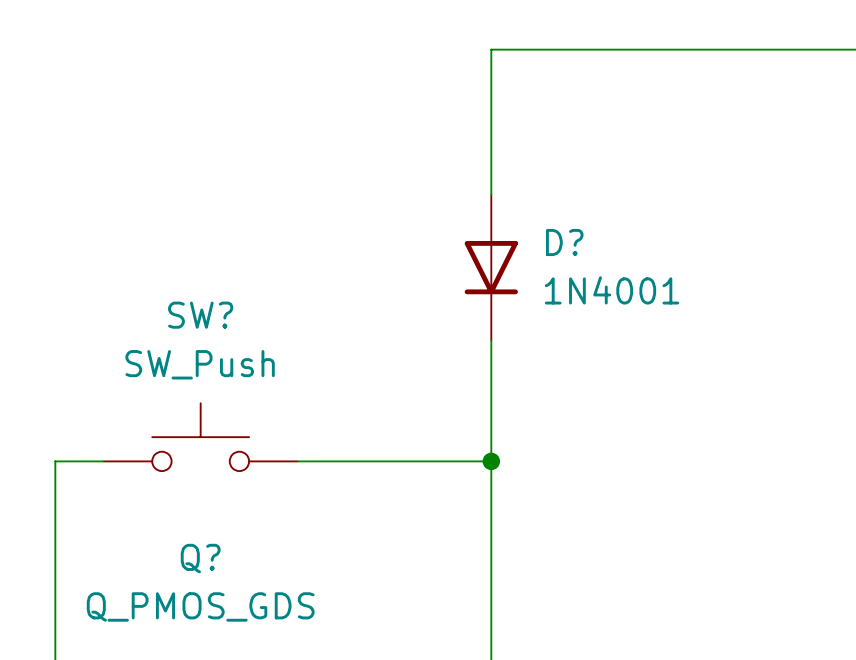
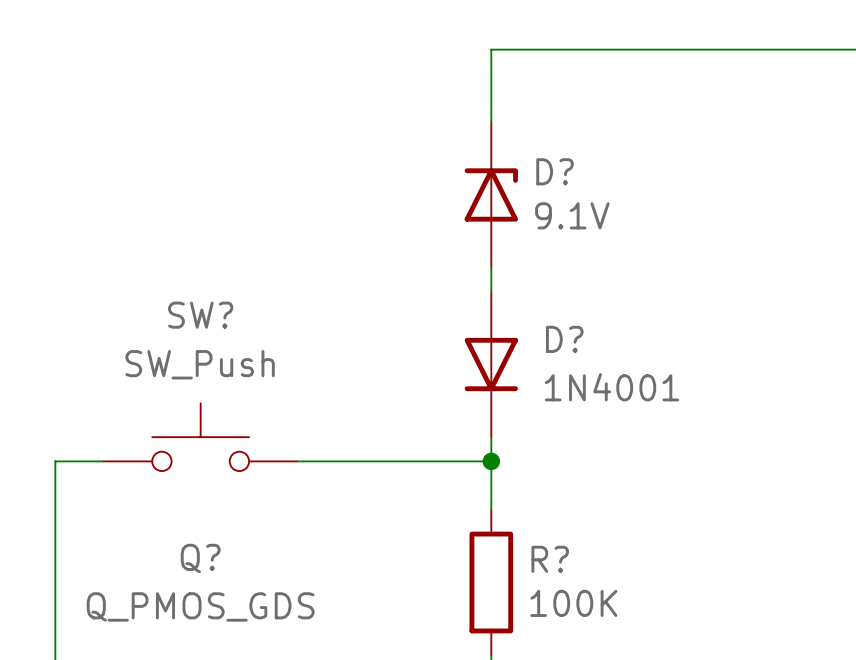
D?: none -> 9.1V (491, 194)
D? position: (491, 267) -> (491, 364)
wire: (491, 509) (491, 655) -> none
R?: none -> 100K (491, 582)

